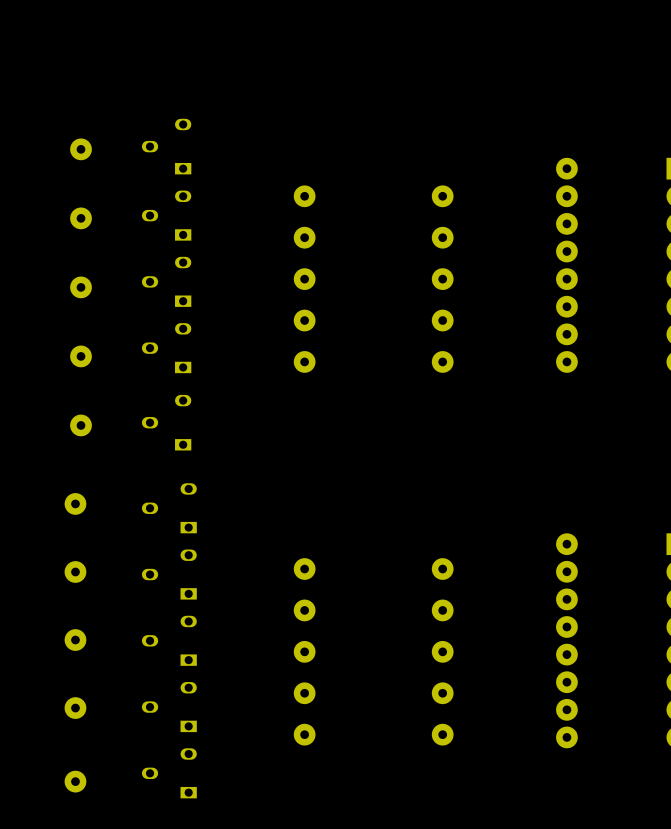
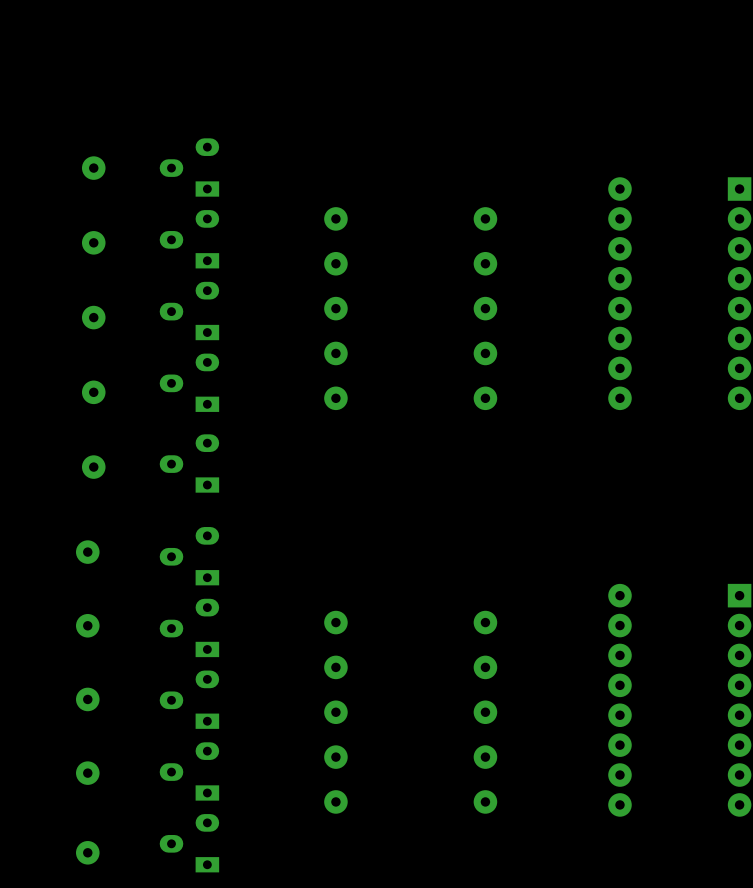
part footprint: [141, 118, 192, 175] -> [159, 138, 220, 197]
part footprint: [141, 190, 192, 241] -> [159, 210, 220, 269]
part footprint: [141, 256, 192, 307] -> [159, 281, 220, 341]
part footprint: [141, 323, 192, 374] -> [159, 353, 220, 412]
part footprint: [141, 394, 192, 451] -> [159, 434, 220, 493]
part footprint: [141, 483, 197, 534] -> [159, 527, 220, 586]
part footprint: [141, 549, 197, 600] -> [159, 598, 220, 658]
part footprint: [141, 615, 197, 666] -> [159, 670, 220, 729]
part footprint: [141, 682, 197, 733] -> [159, 742, 220, 801]
part footprint: [141, 748, 197, 799] -> [159, 814, 220, 873]

